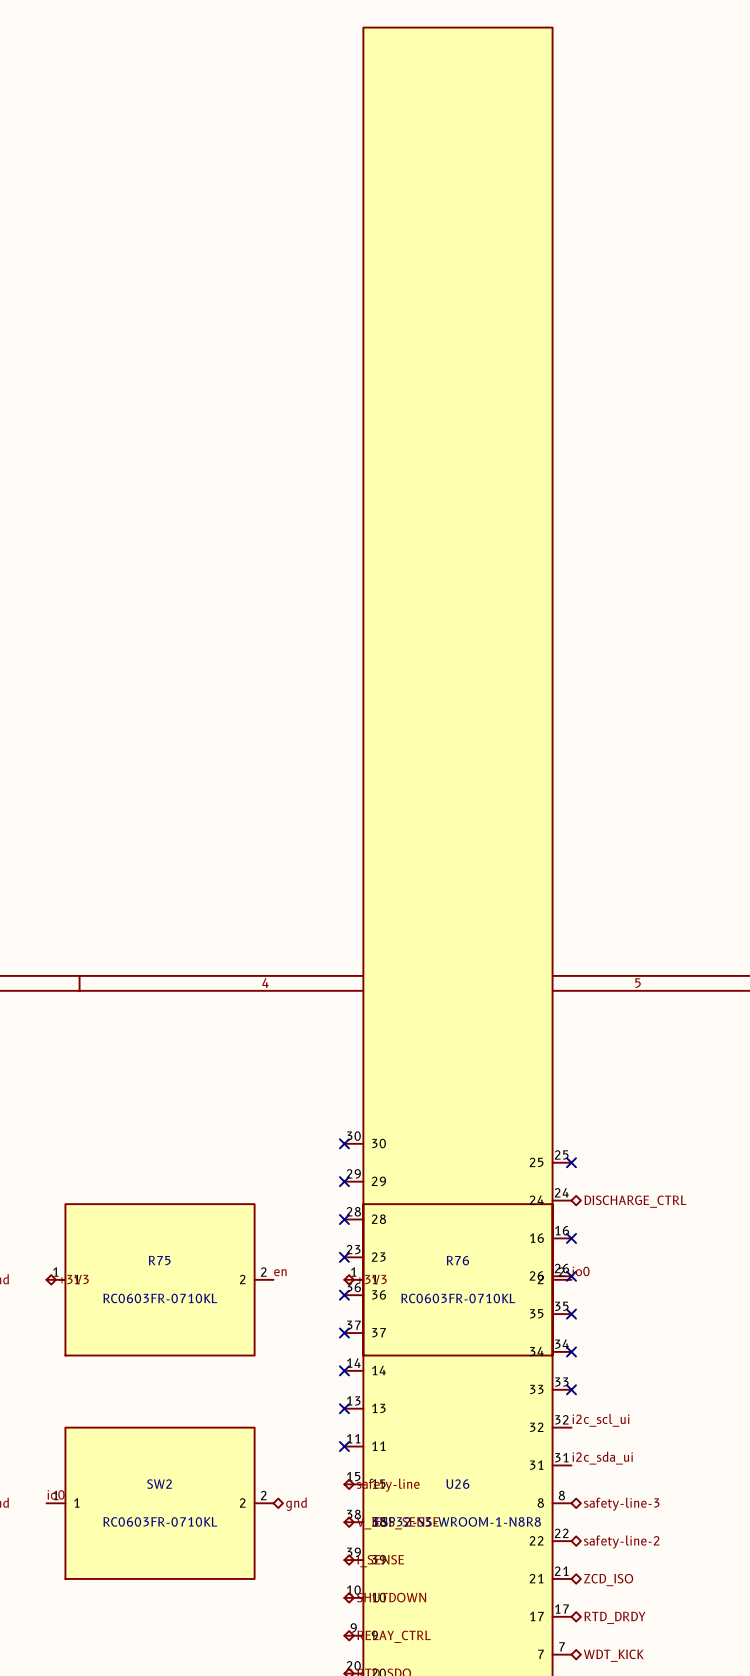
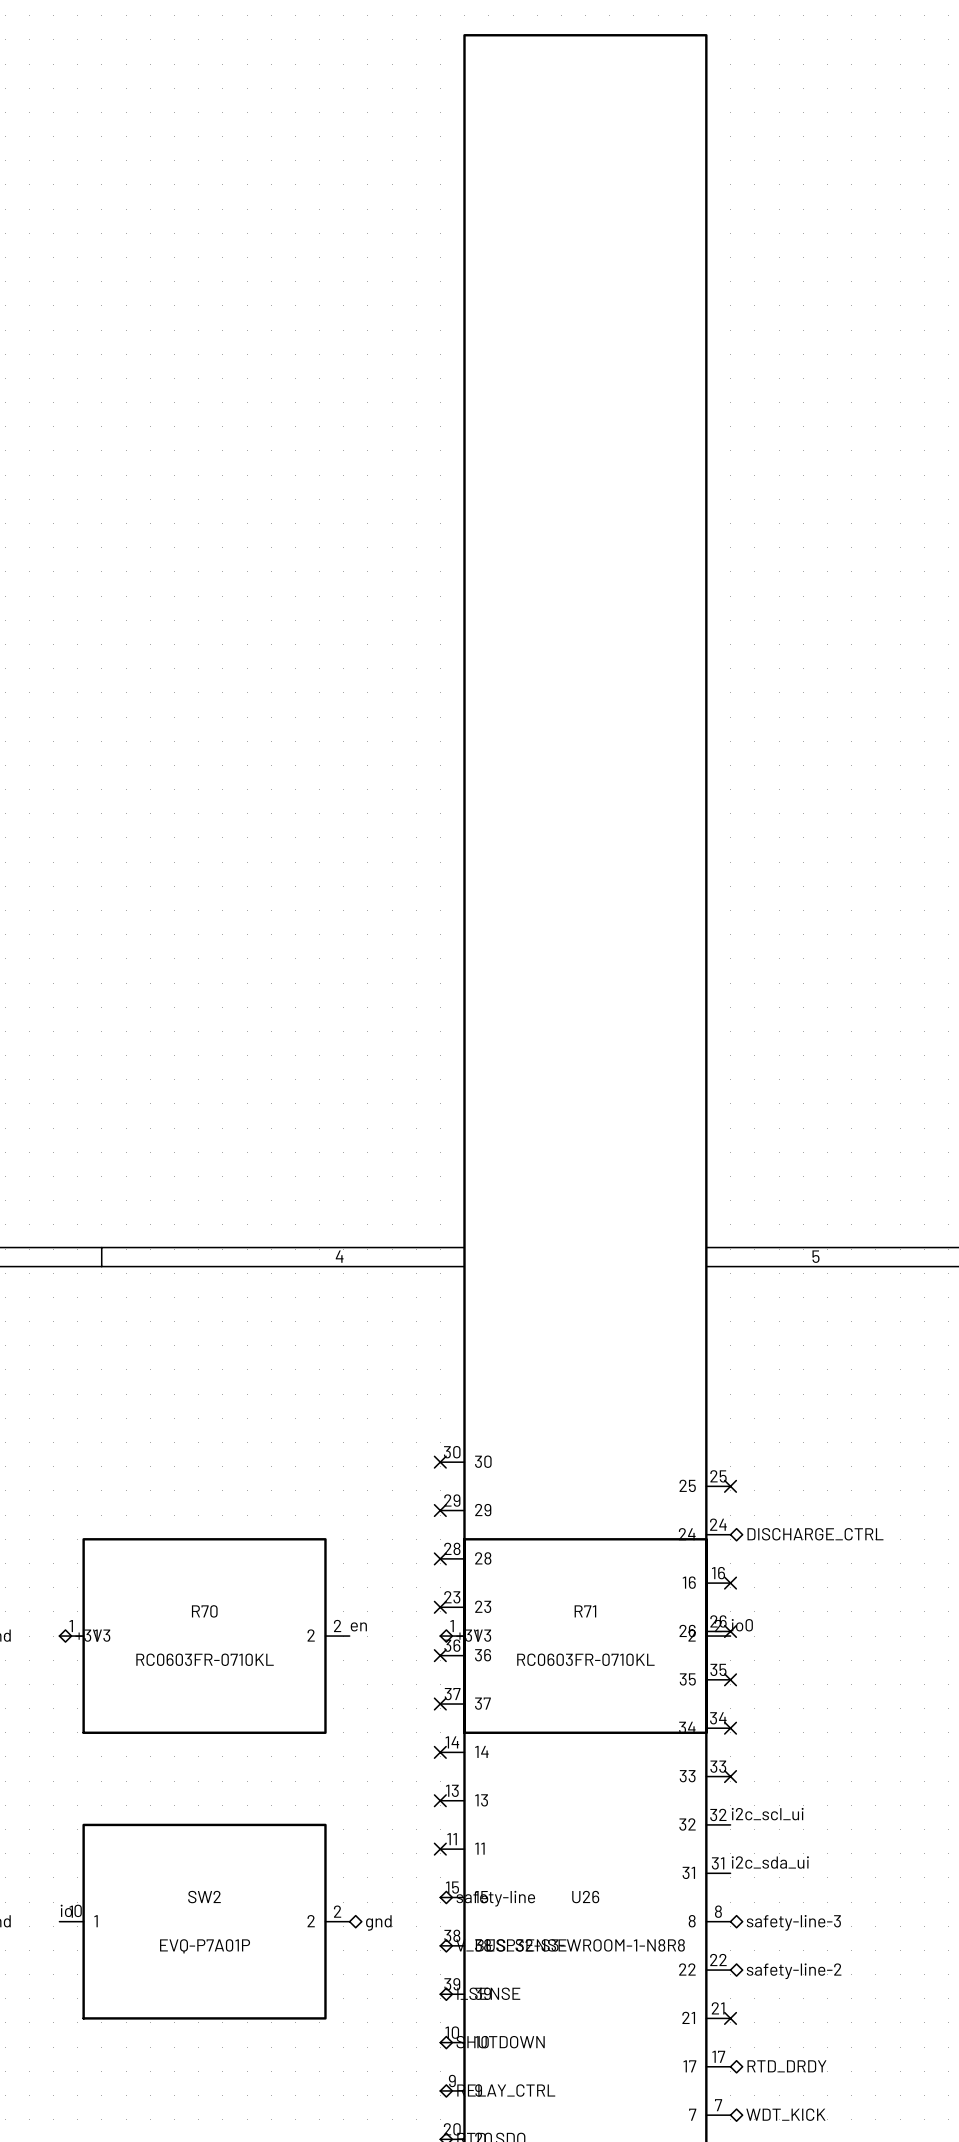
R75 name: R75 (159, 1260) -> R70 (204, 1611)
R76 name: R76 (457, 1260) -> R71 (585, 1611)
SW2 value: RC0603FR-0710KL (160, 1521) -> EVQ-P7A01P (205, 1946)
no-connect mark: none -> (730, 2018)
hierarchical label: ZCD_ISO (608, 1580) -> none

